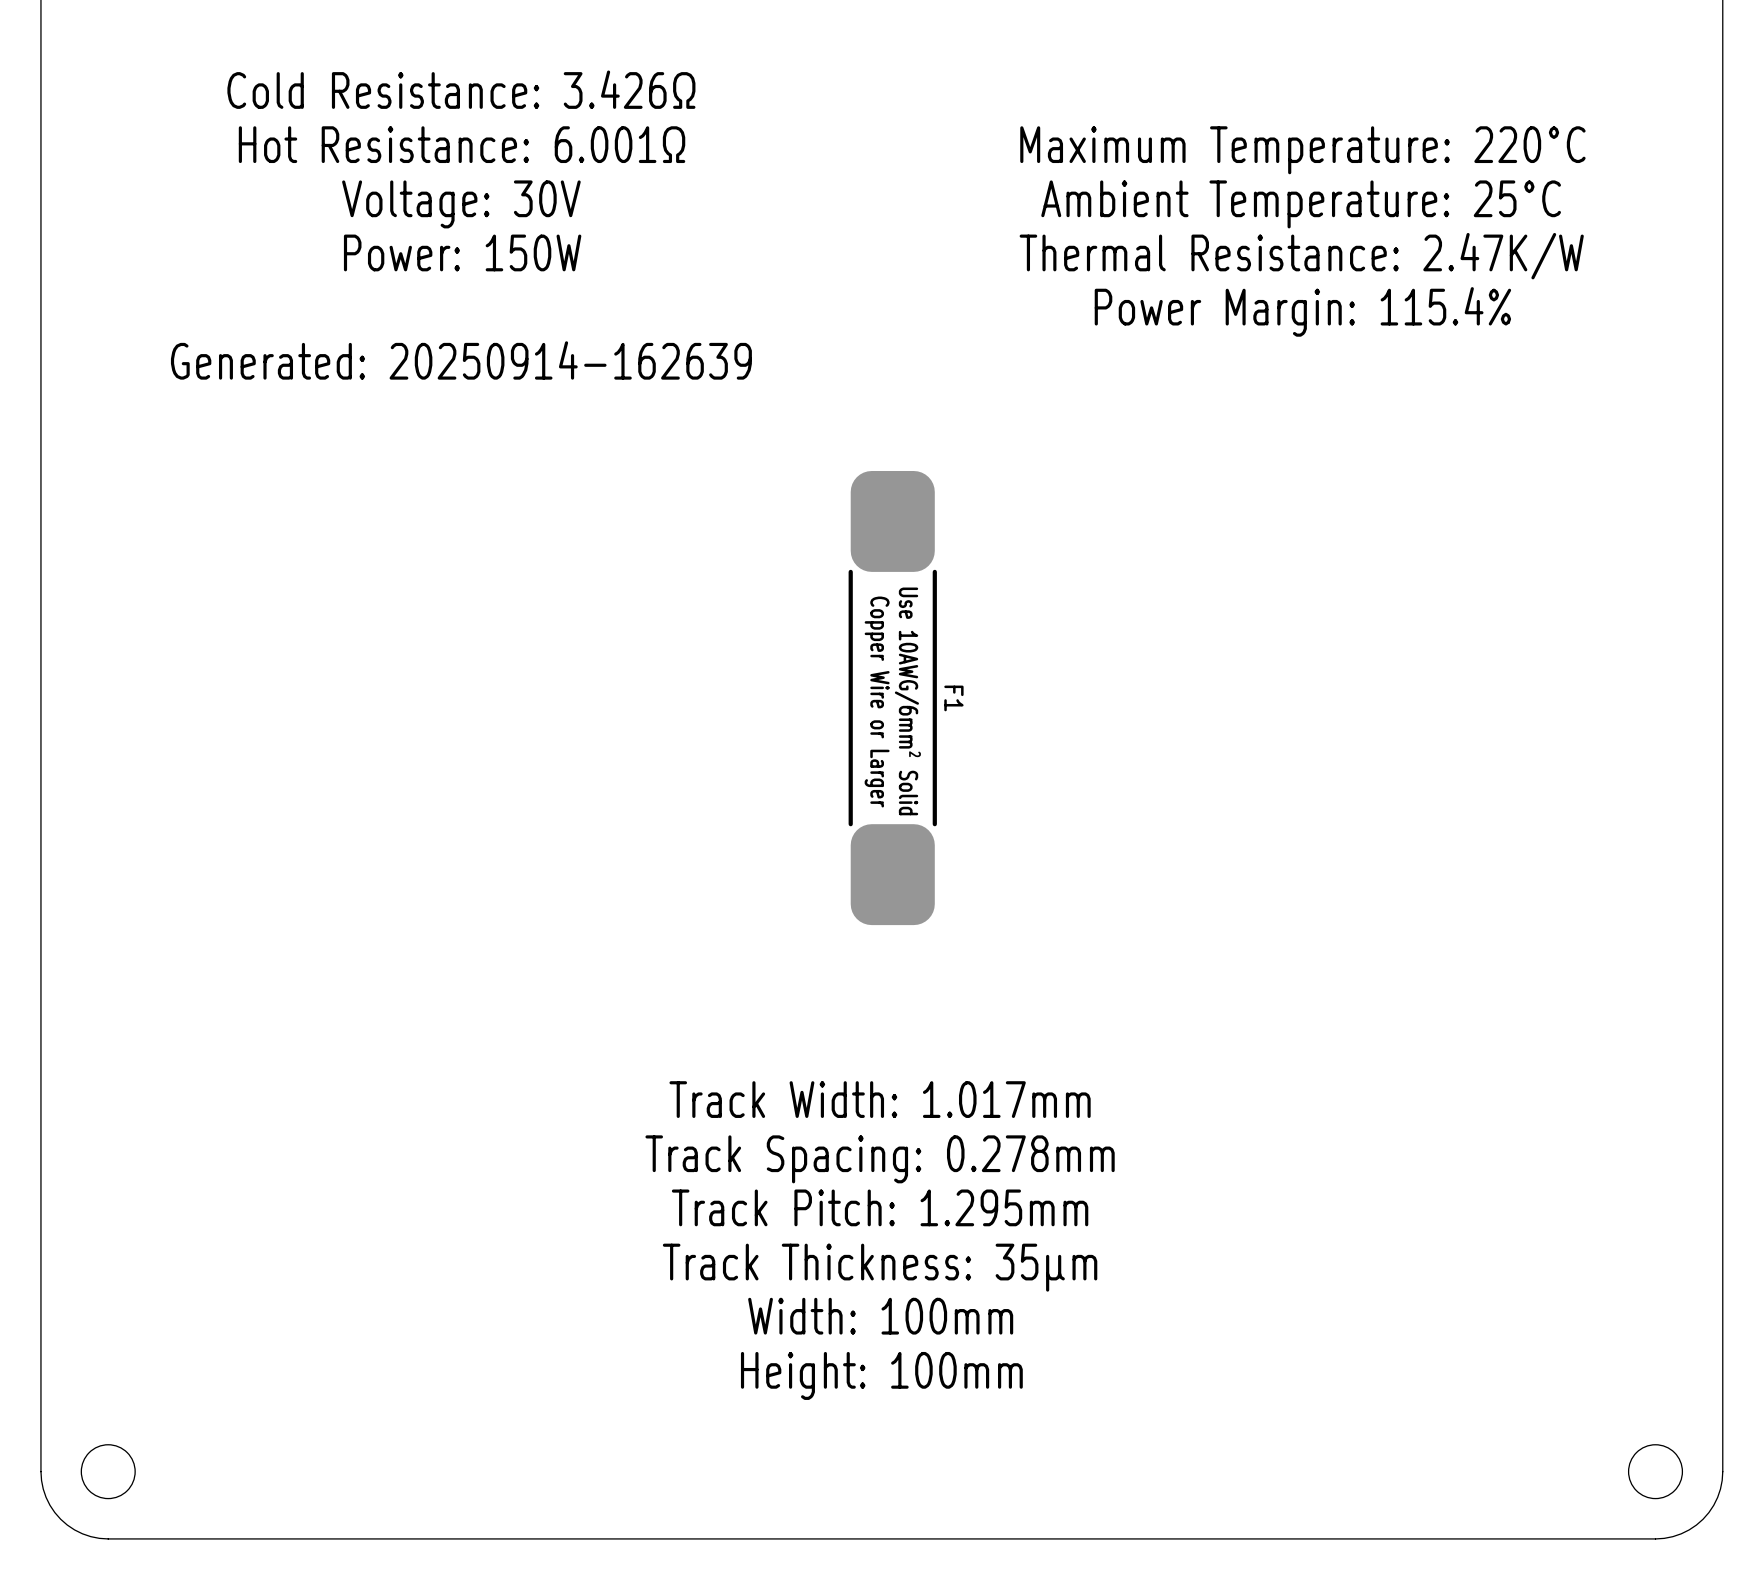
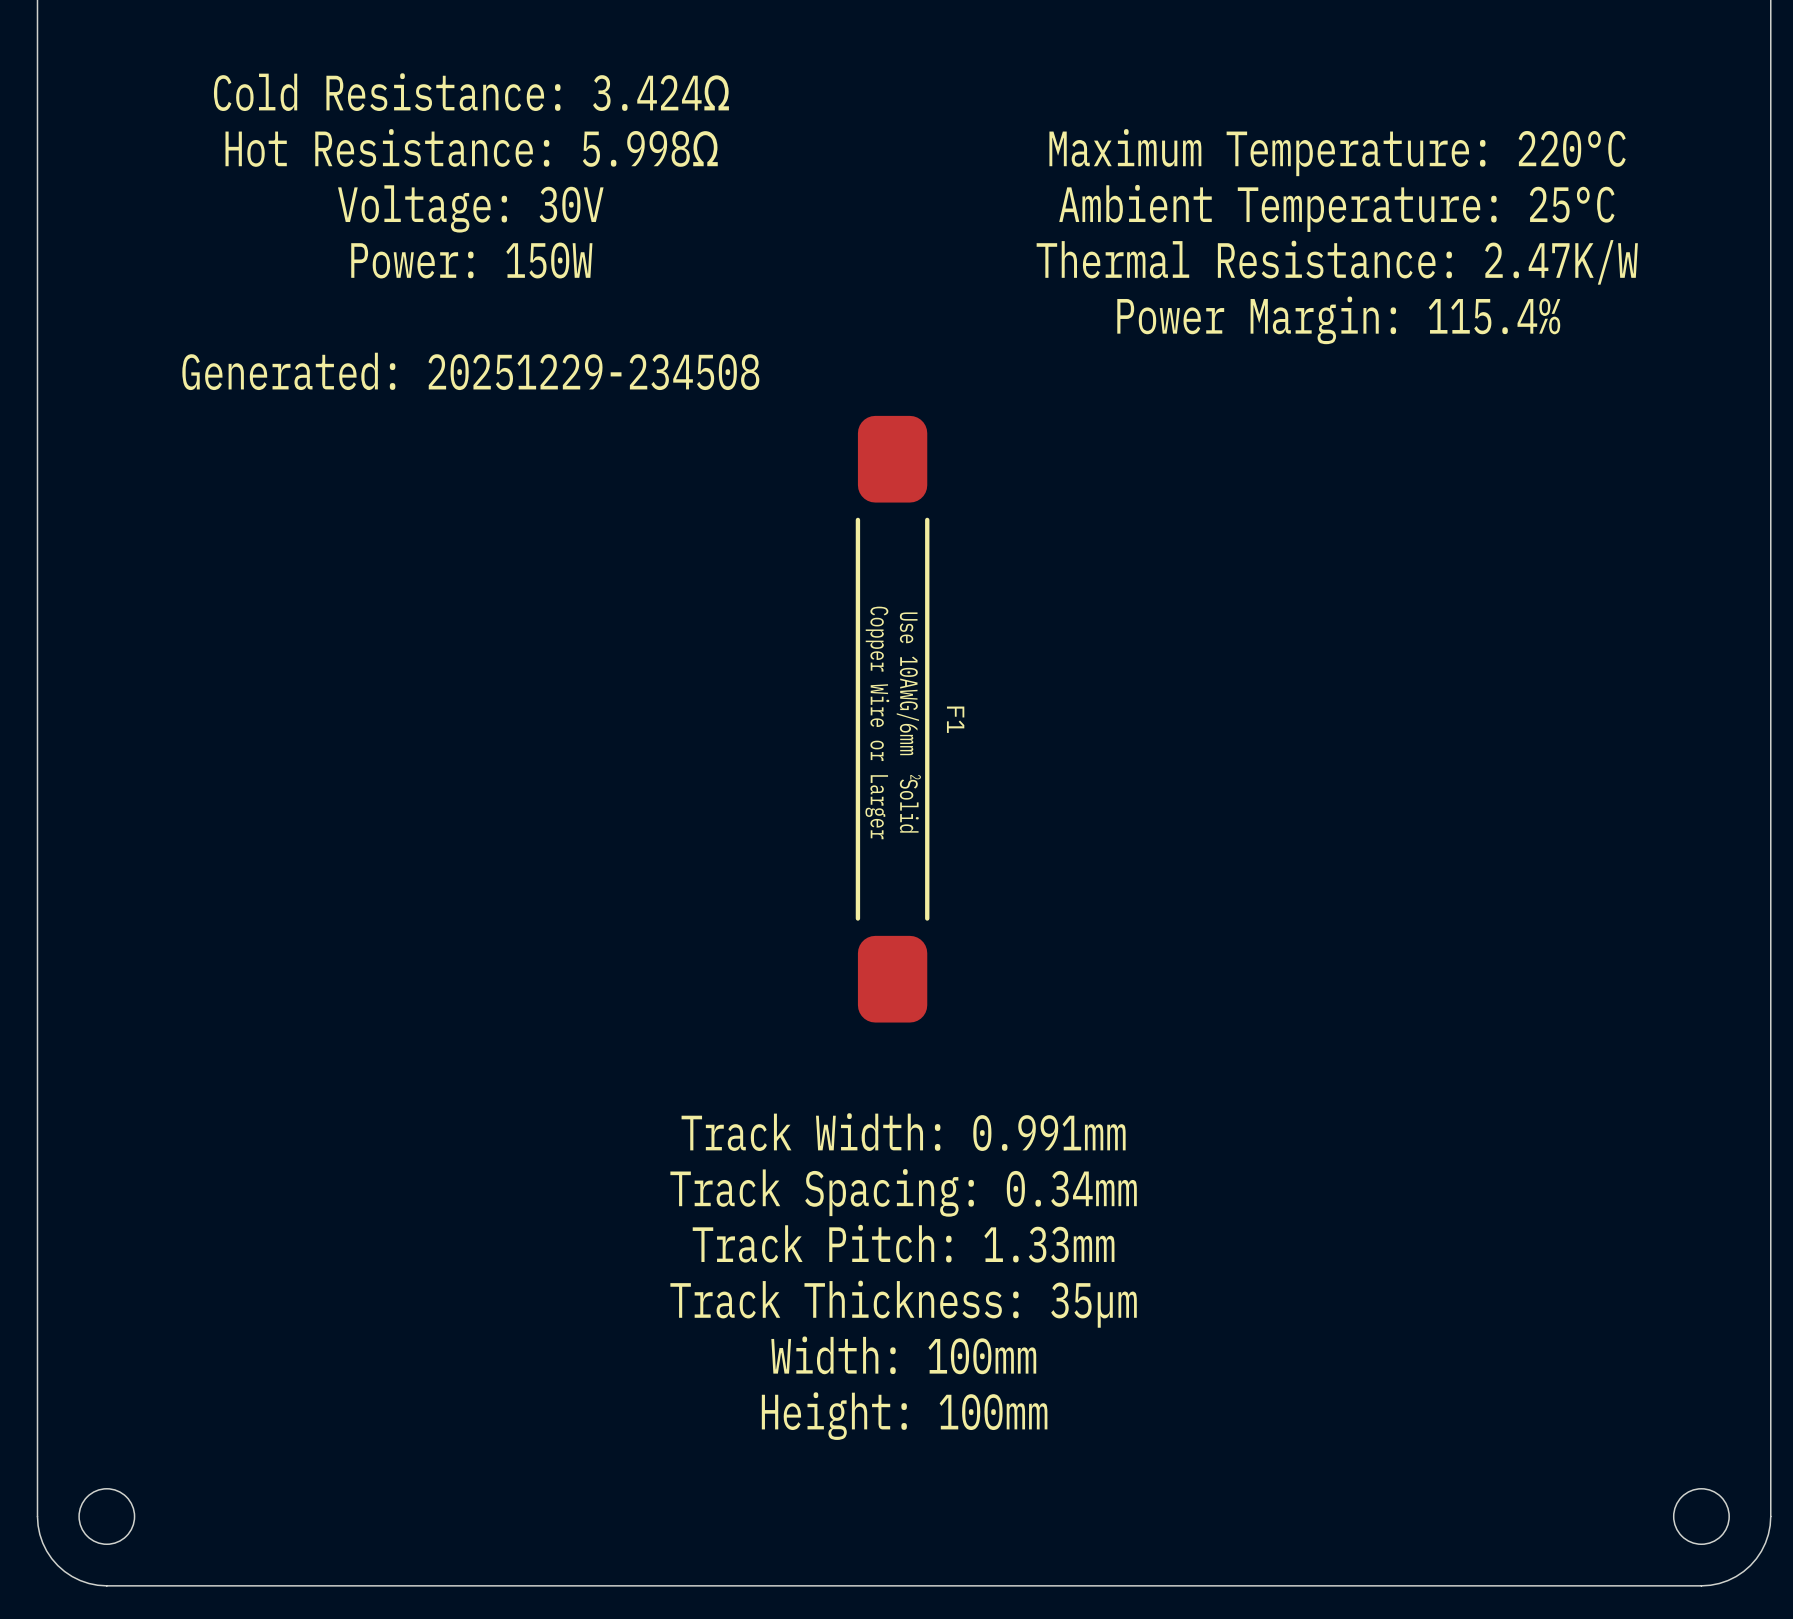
text: Cold Resistance: 3.426Ω (461, 89) -> Cold Resistance: 3.424Ω (471, 92)
text: Hot Resistance: 6.001Ω (462, 144) -> Hot Resistance: 5.998Ω (471, 147)
text: Generated: 20250914-162639 (461, 360) -> Generated: 20251229-234508 (470, 371)
F1 footprint: [848, 471, 937, 926] -> [855, 415, 930, 1023]
text: Track Width: 1.017mm (880, 1099) -> Track Width: 0.991mm (903, 1132)
text: Track Spacing: 0.278mm (880, 1159) -> Track Spacing: 0.34mm (903, 1192)
text: Track Pitch: 1.295mm (880, 1207) -> Track Pitch: 1.33mm (903, 1243)

